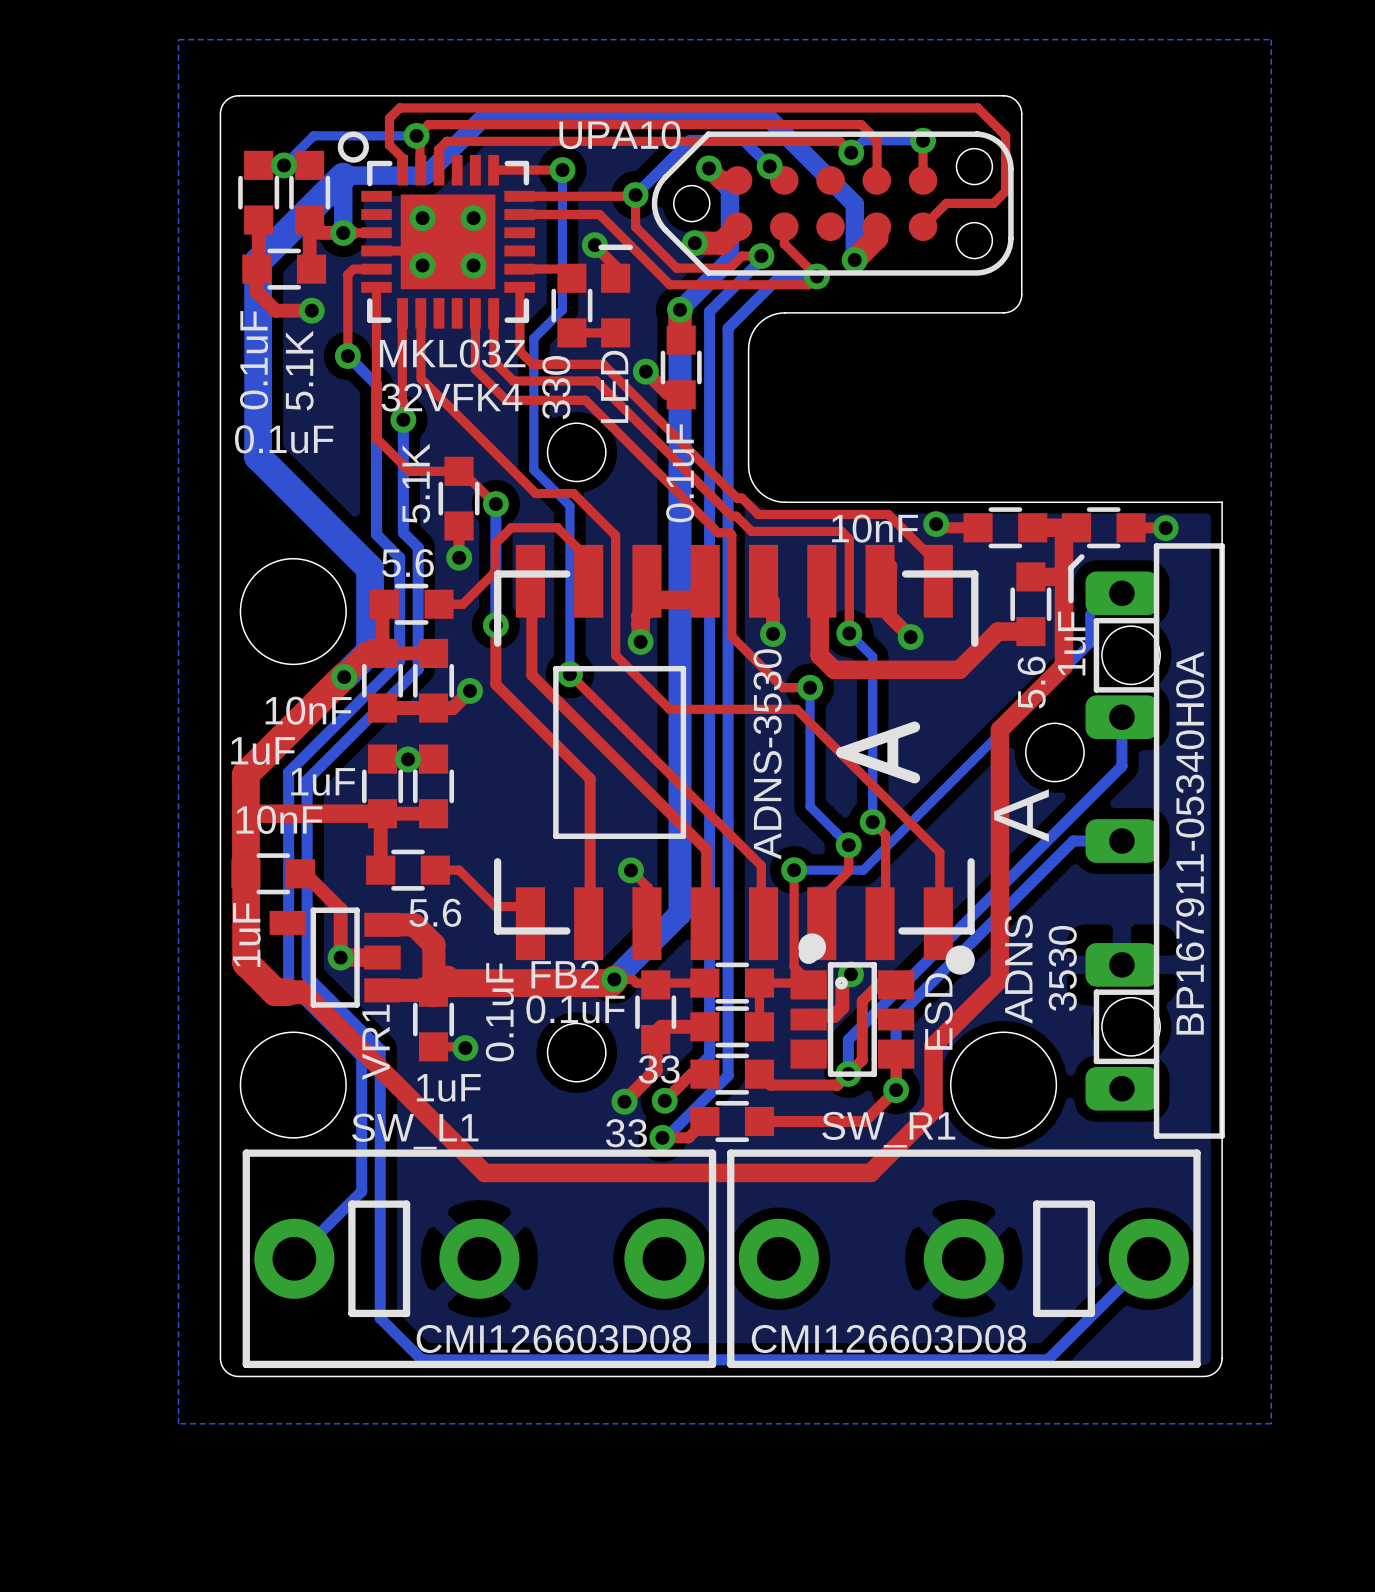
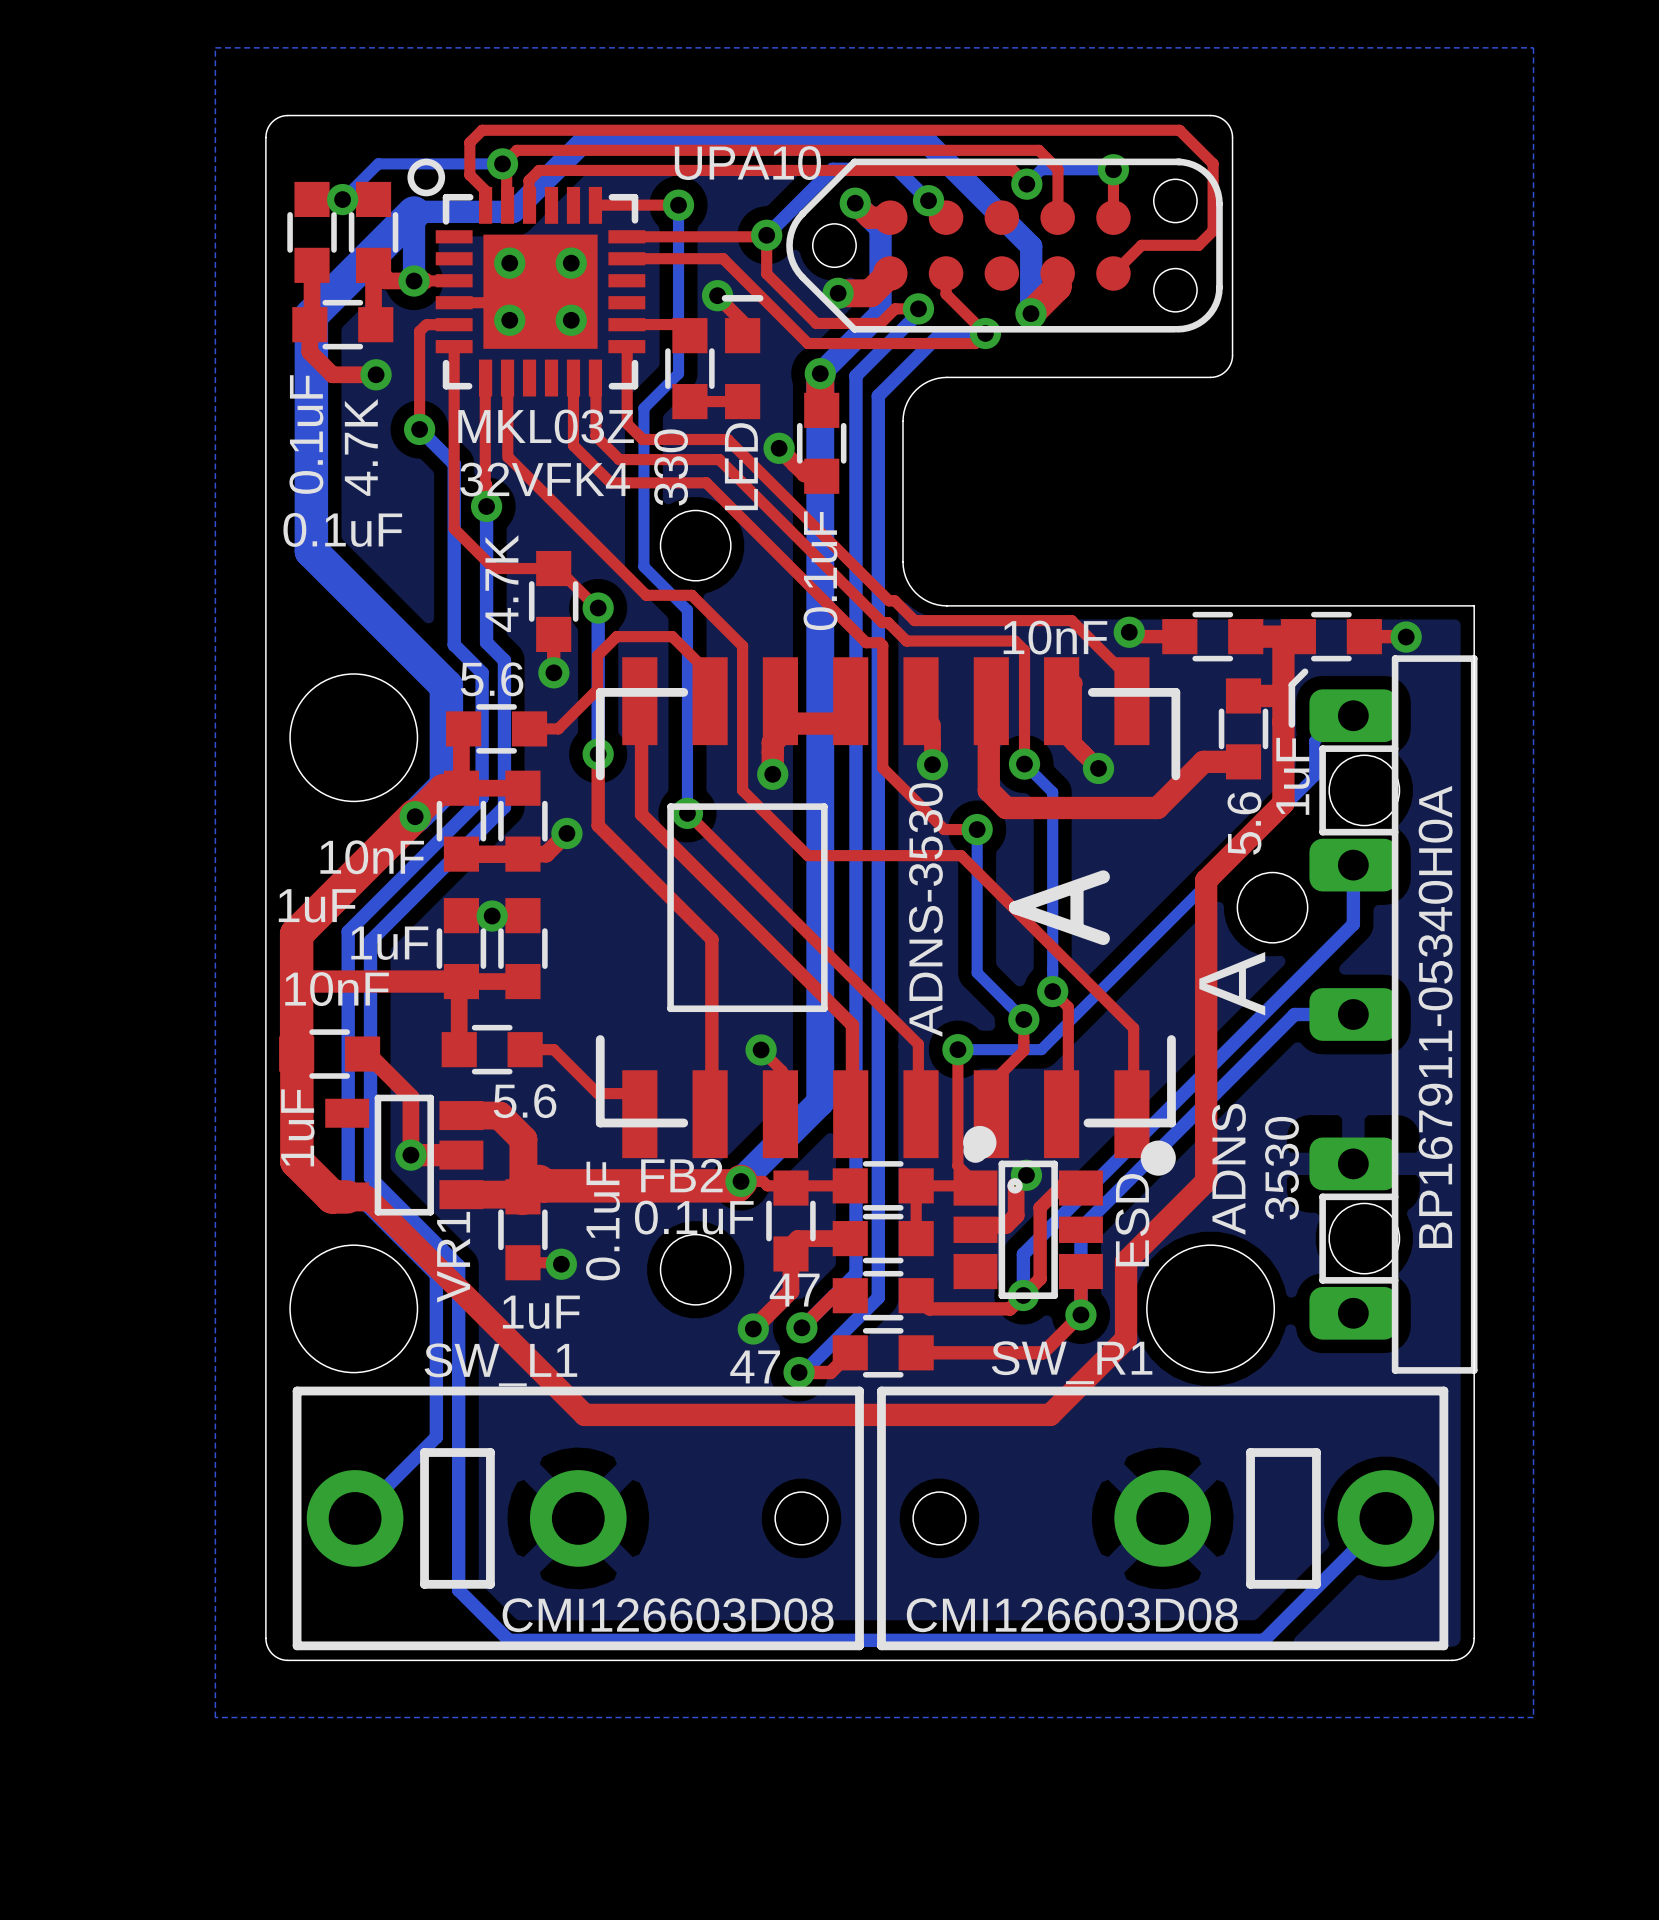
part value: 5.1K (299, 370) -> 4.7K (361, 447)
part value: 5.1K (416, 483) -> 4.7K (501, 583)
part value: 33 (659, 1069) -> 47 (794, 1290)
part value: 33 (626, 1133) -> 47 (755, 1366)
SW_L1 footprint: [242, 1149, 717, 1369] -> [292, 1386, 864, 1651]
SW_R1 footprint: [727, 1149, 1201, 1369] -> [877, 1386, 1449, 1651]

